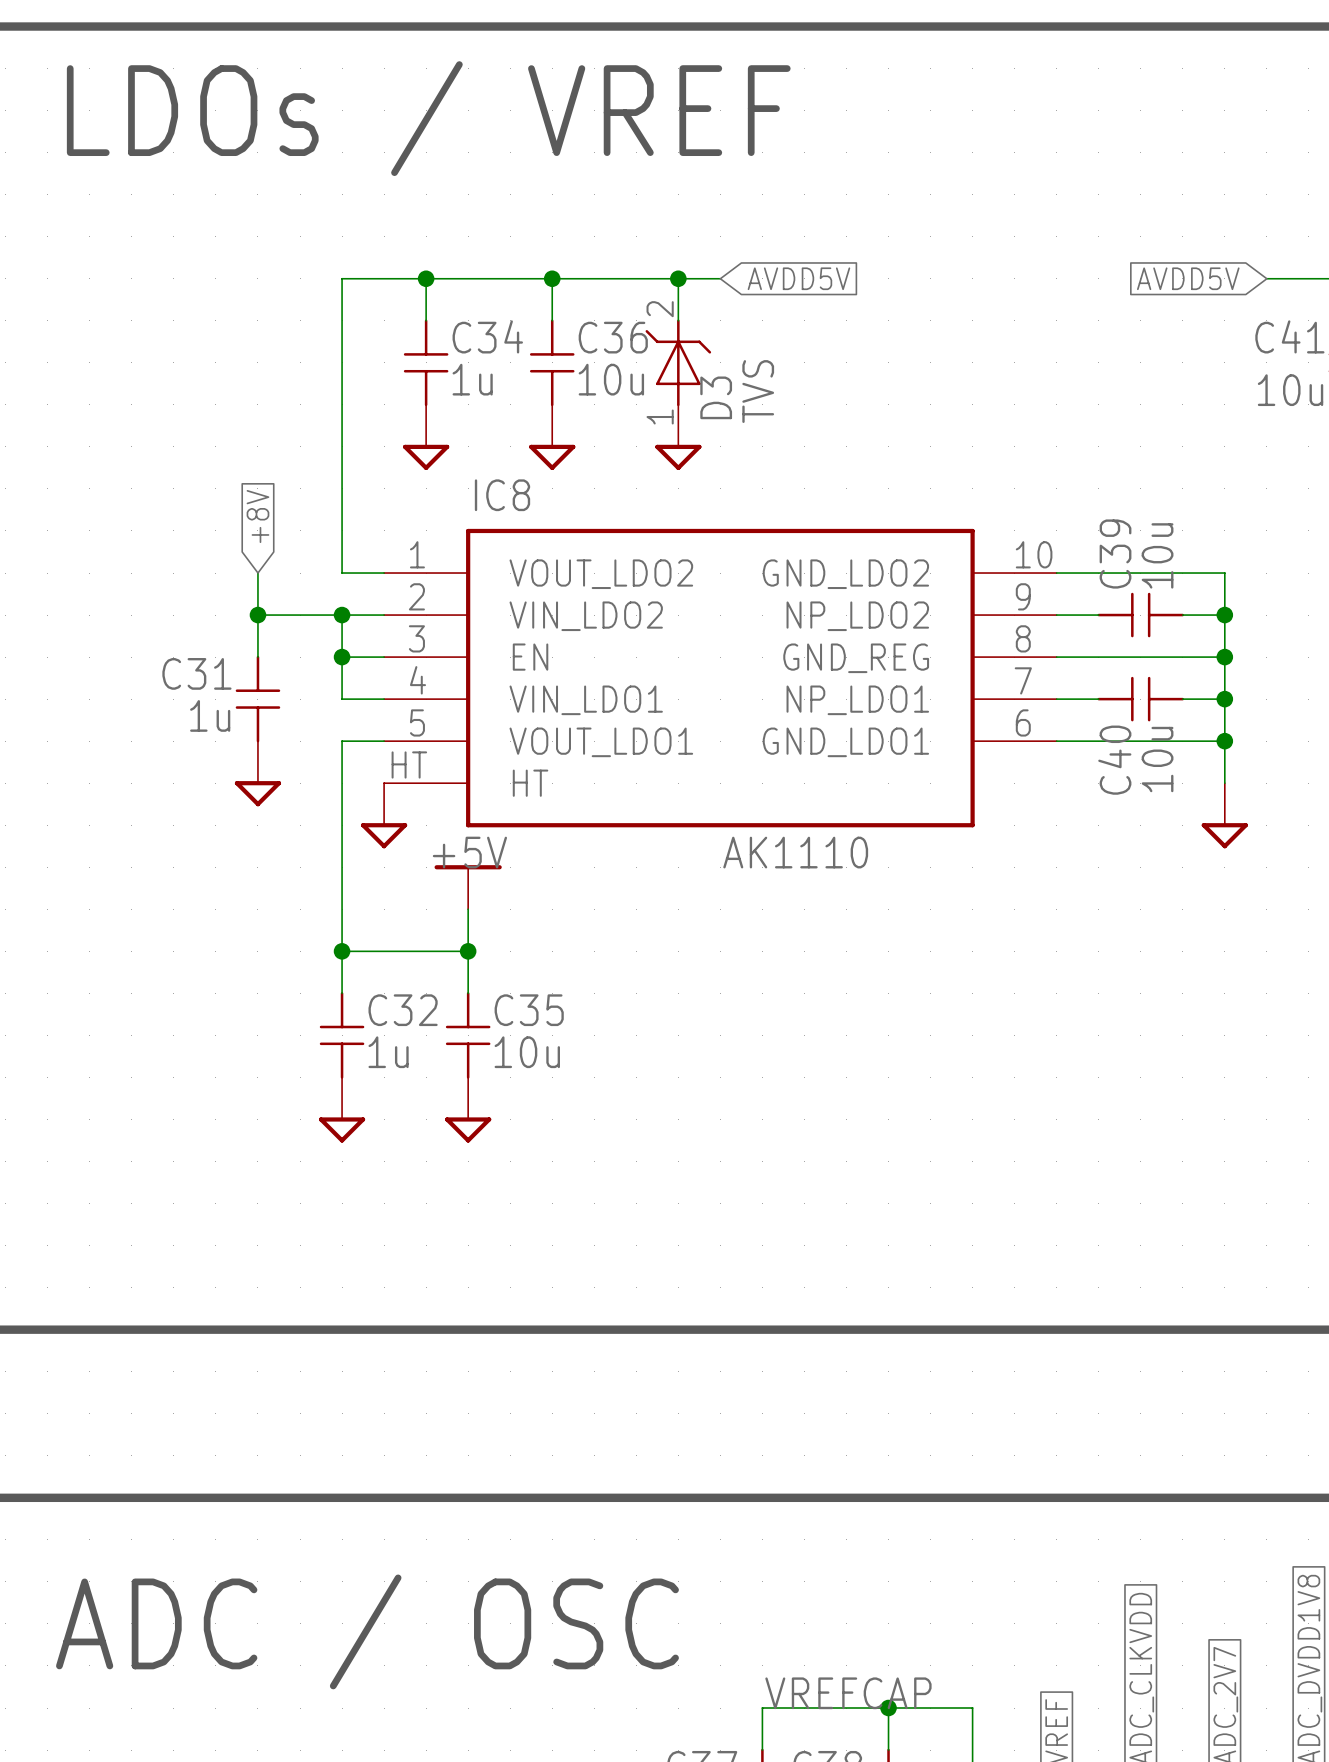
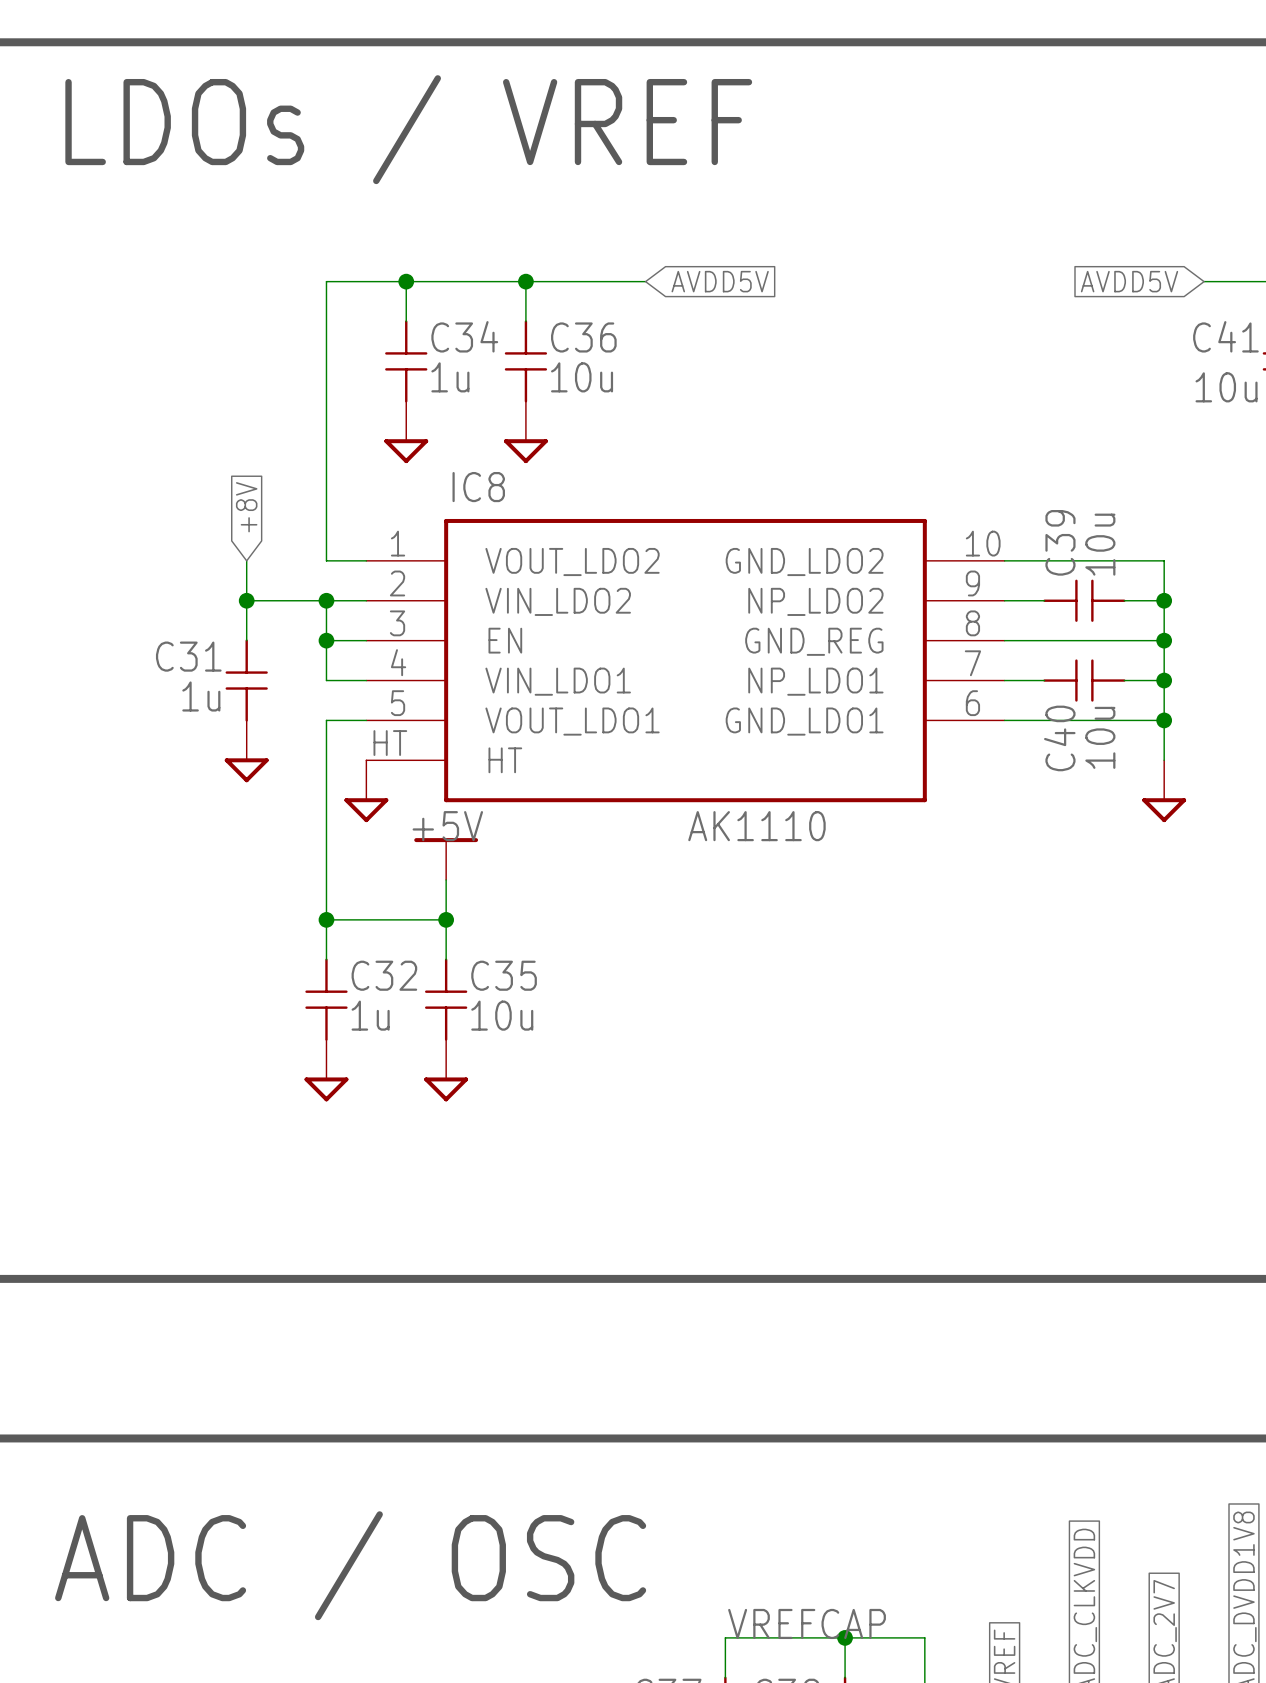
junction: (678, 278) -> none
wire: (720, 278) (678, 278) (678, 320) -> none
global label position: AVDD5V (798, 278) -> AVDD5V (720, 281)
D3: TVS (678, 362) -> none
power symbol: (678, 437) -> none

